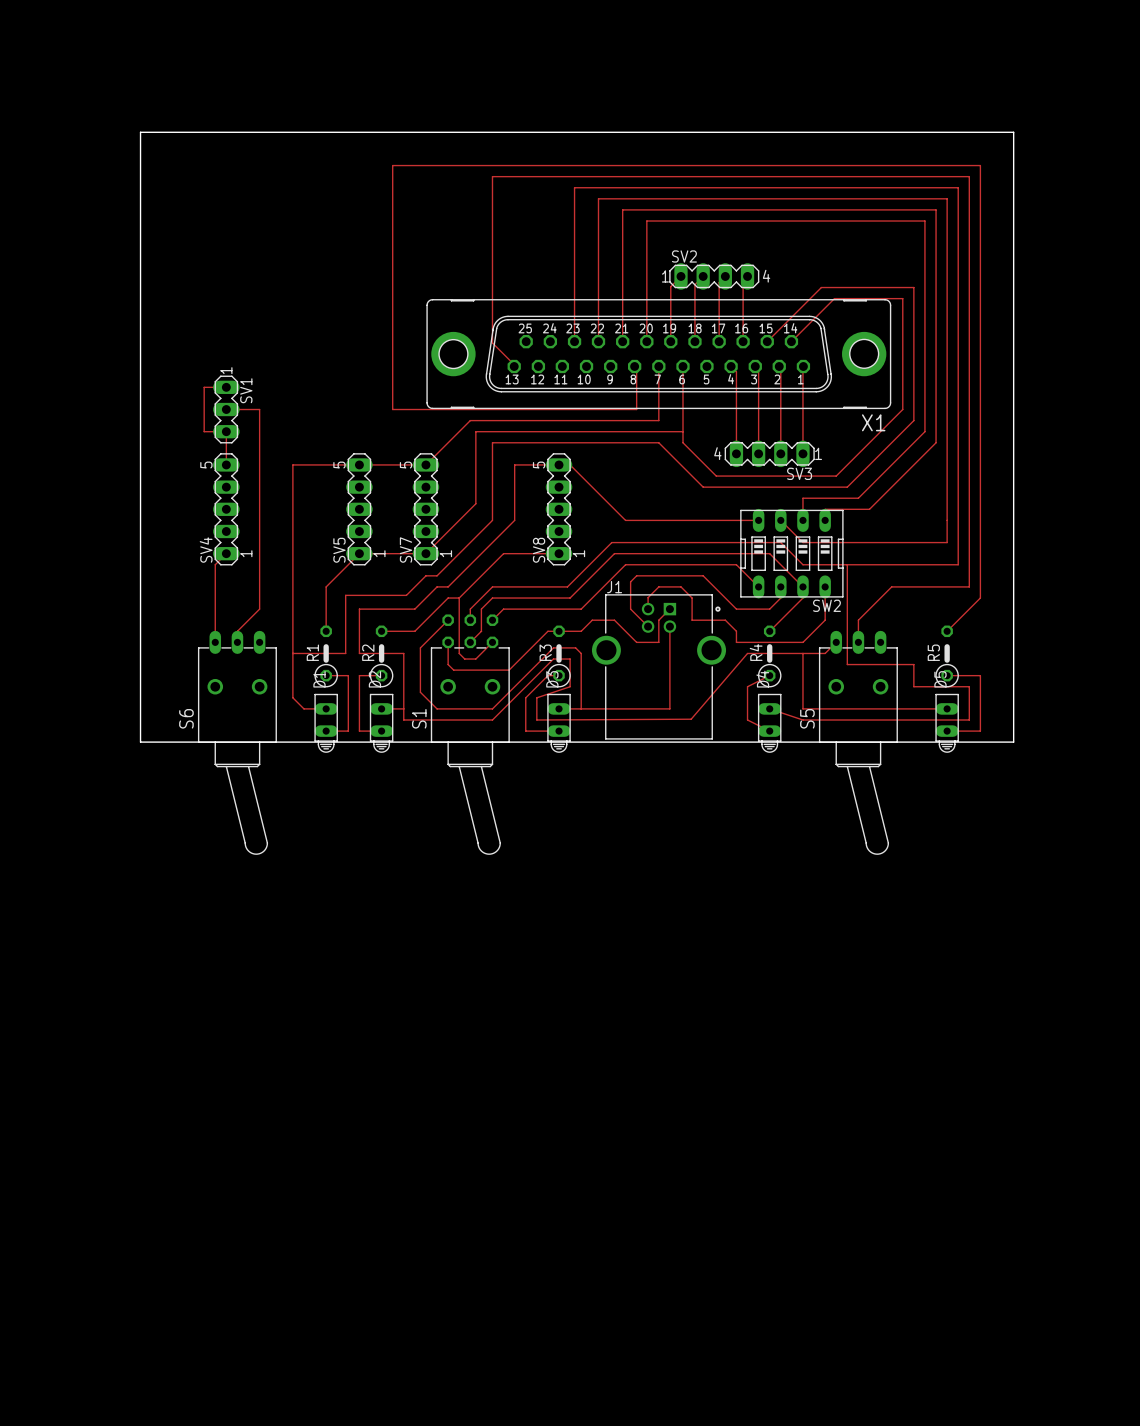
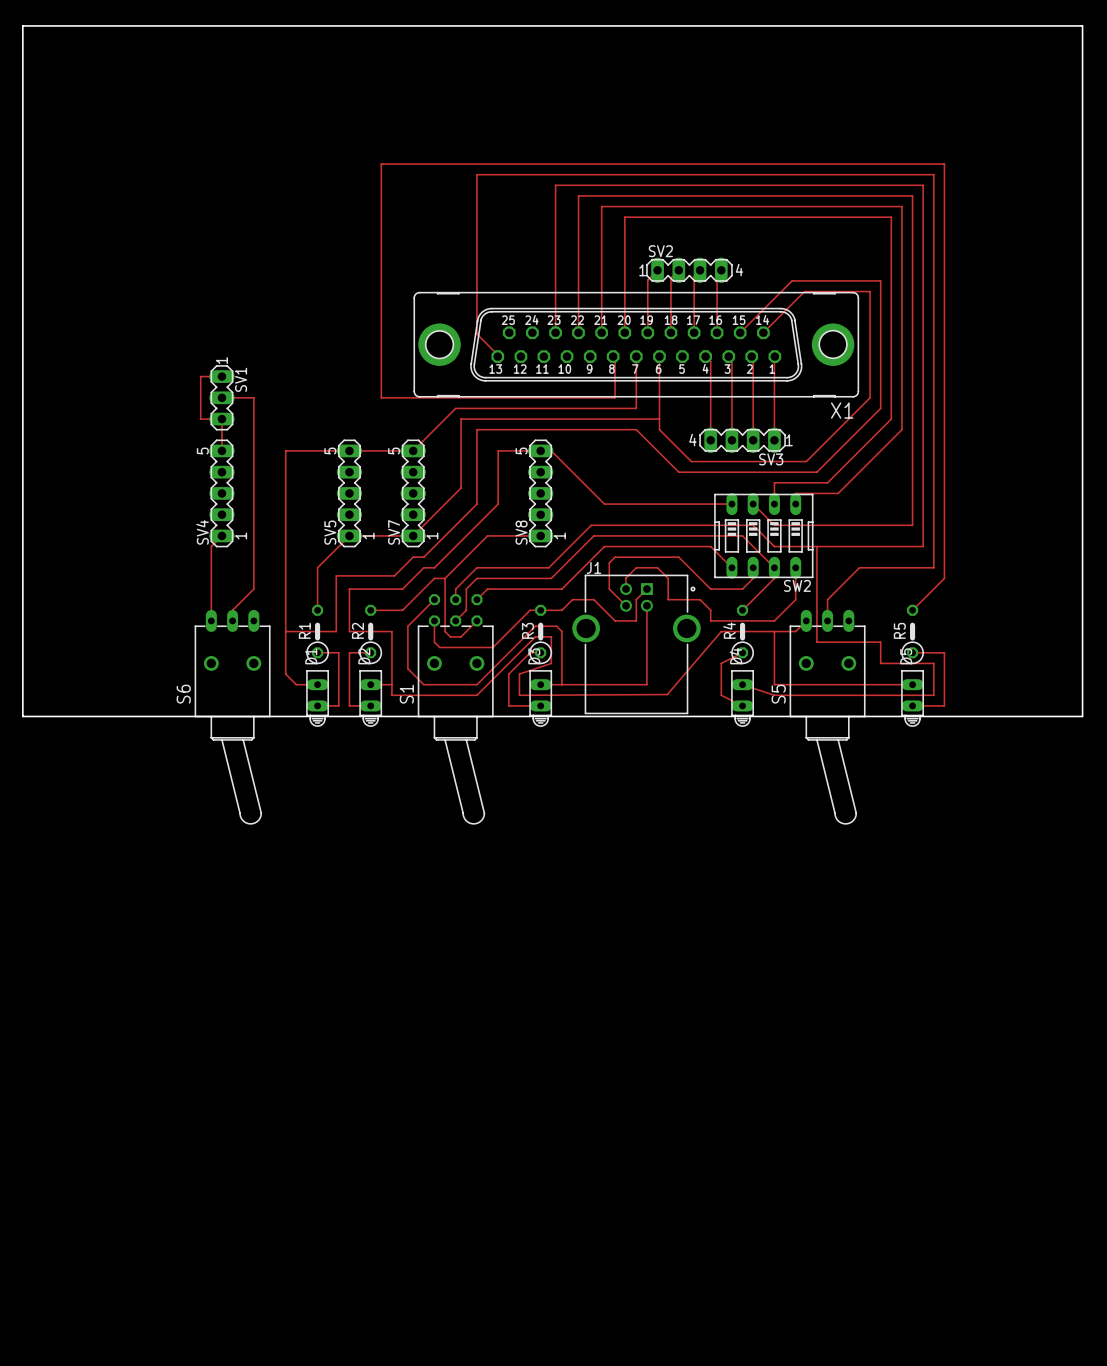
board edge: (140, 742) (140, 132) (1013, 132) (1013, 742) -> (139, 716) (22, 716) (22, 25) (1082, 25) (1082, 716) (976, 716)

